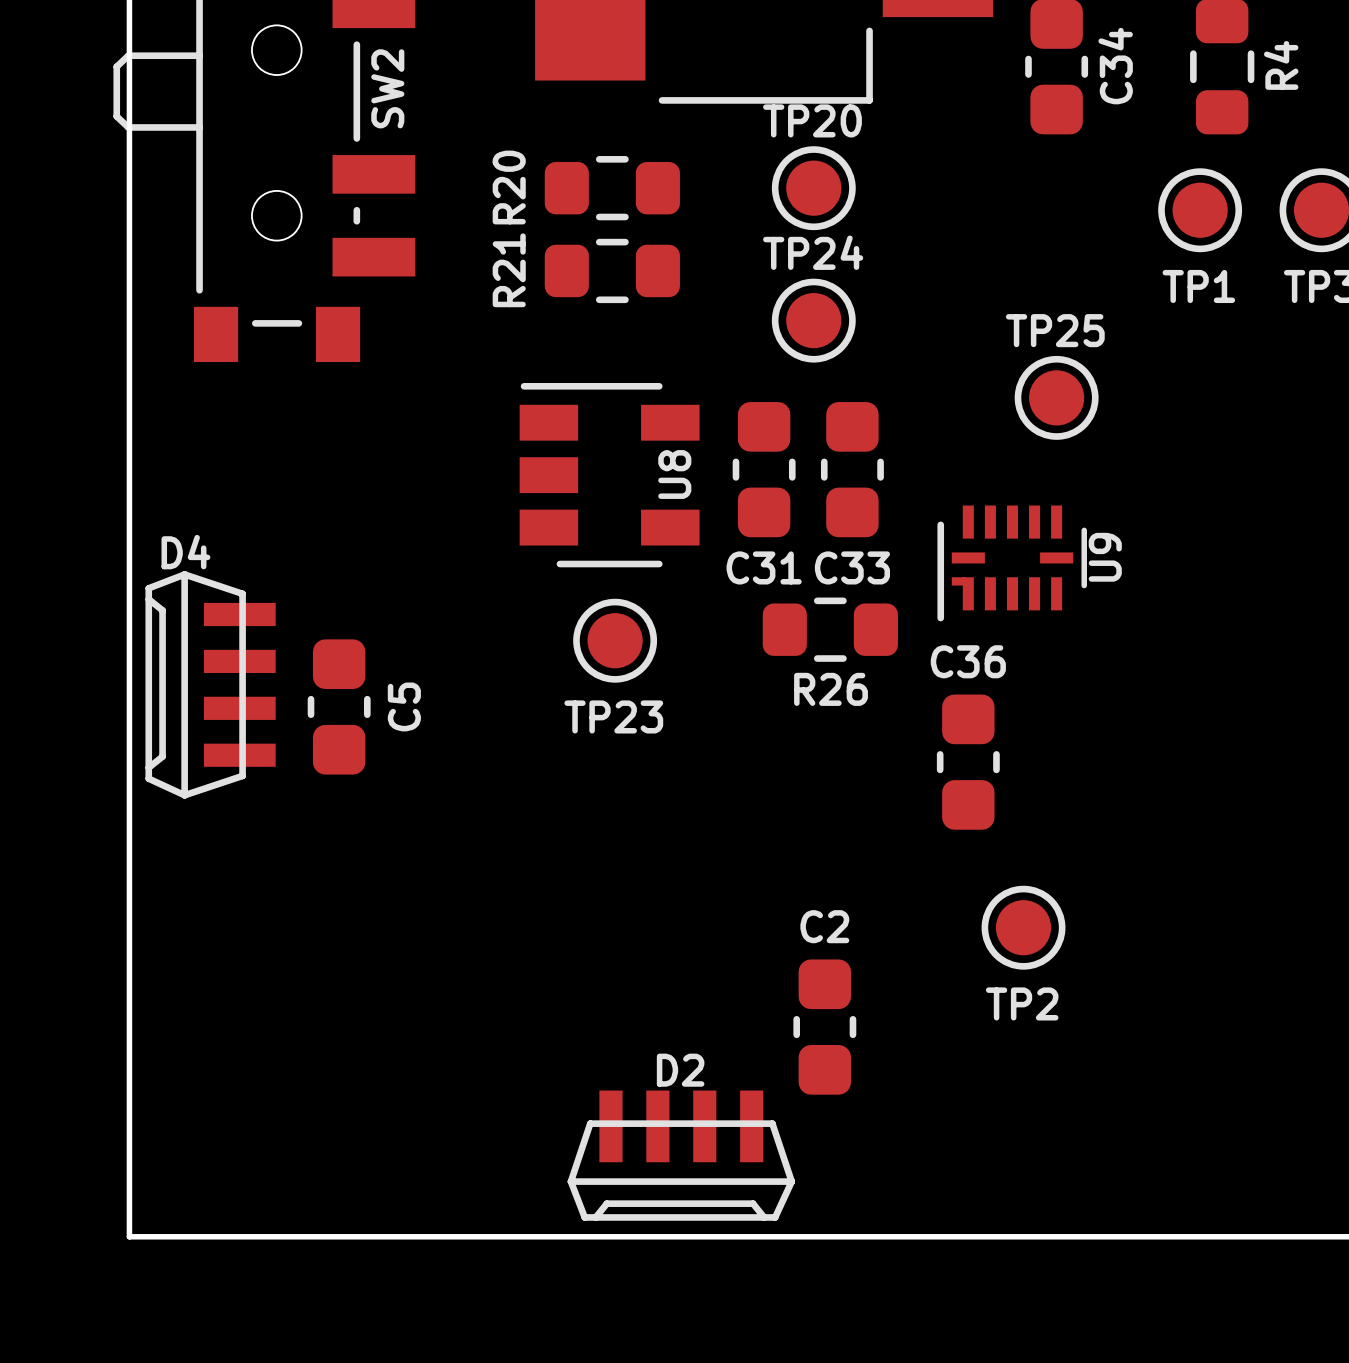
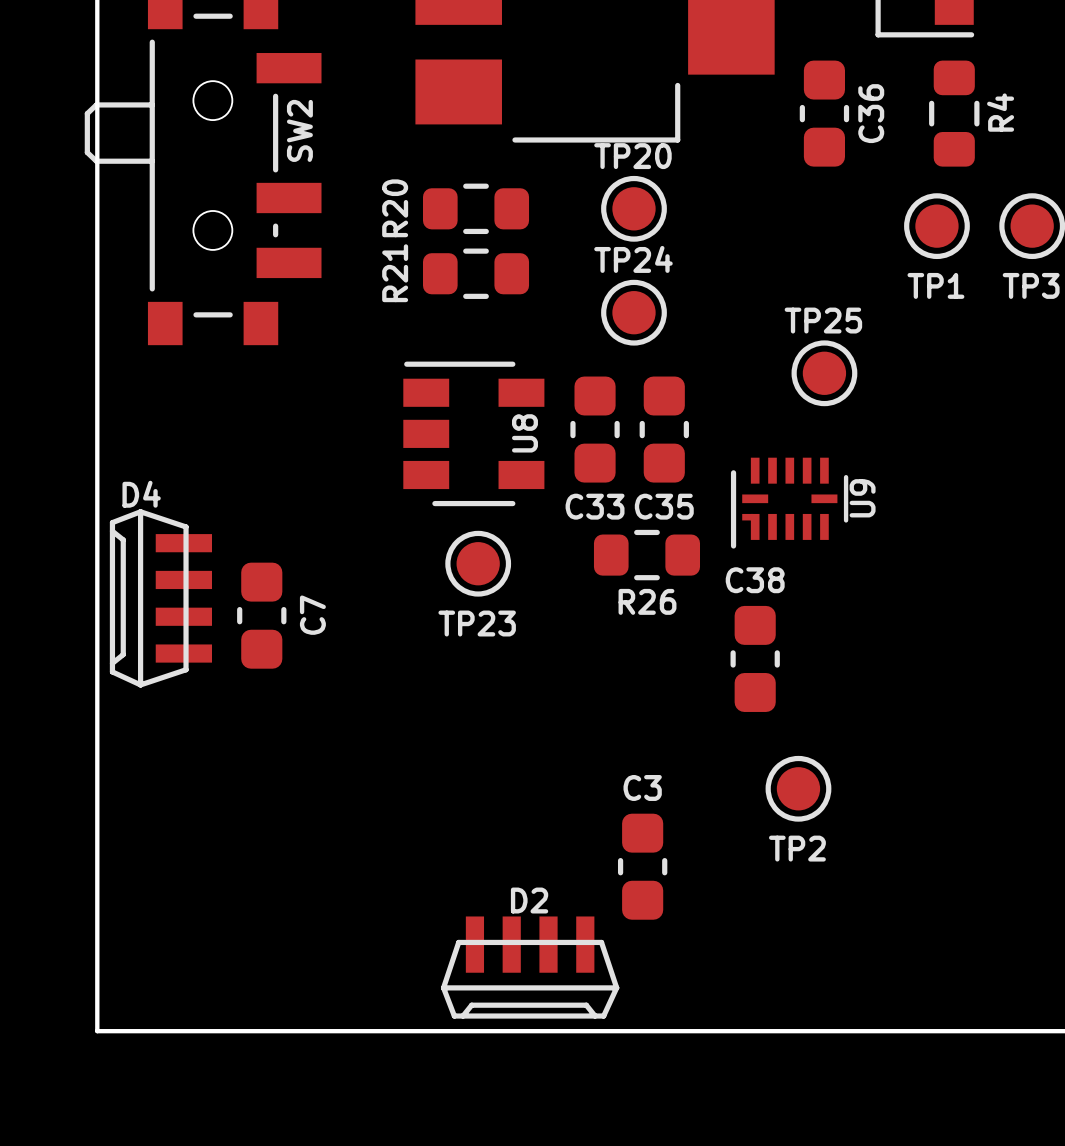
C34 name: C34 (1115, 66) -> C36 (871, 113)
C31 name: C31 (764, 567) -> C33 (595, 506)
C33 name: C33 (852, 567) -> C35 (664, 506)
C36 name: C36 (968, 661) -> C38 (755, 580)
C5 name: C5 (404, 706) -> C7 (312, 615)
C2 name: C2 (824, 926) -> C3 (642, 787)

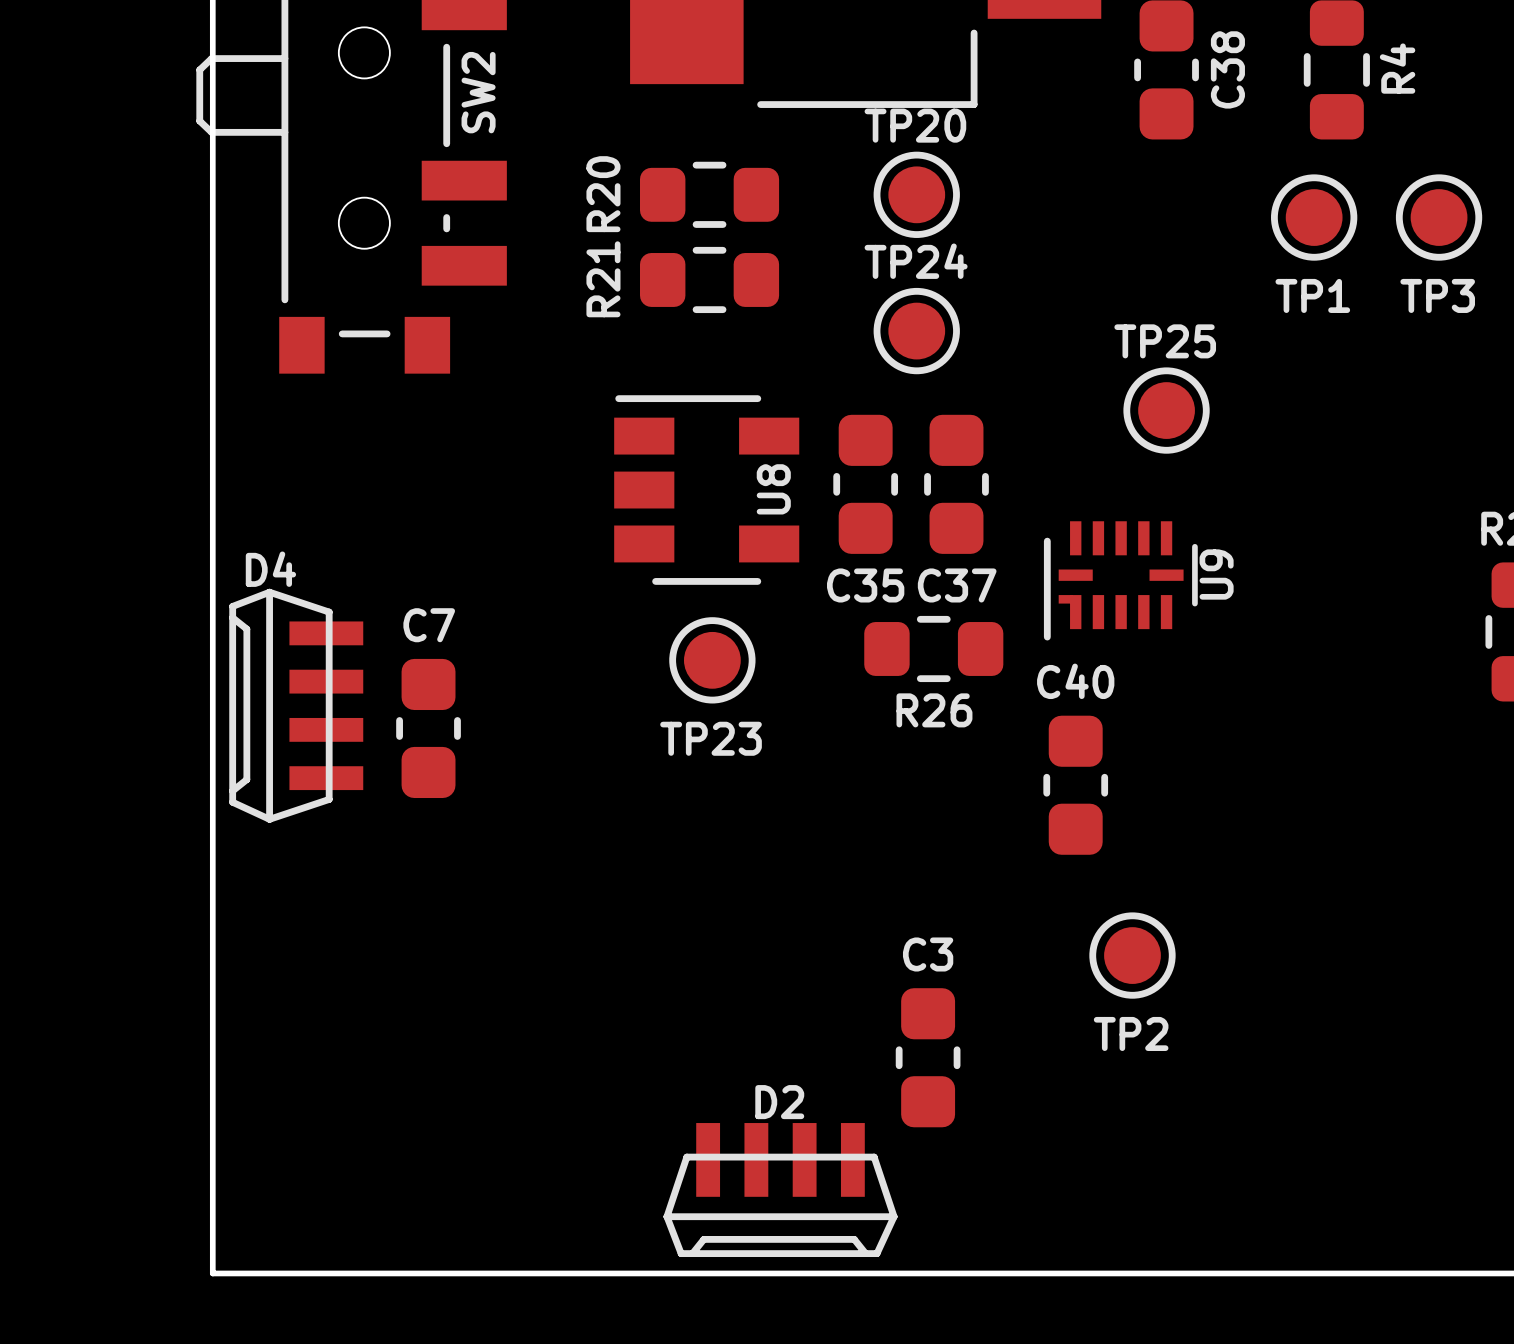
C36 name: C36 (871, 113) -> C38 (1227, 69)
C33 name: C33 (595, 506) -> C35 (865, 585)
C35 name: C35 (664, 506) -> C37 (957, 585)
C38 name: C38 (755, 580) -> C40 (1075, 681)
C7 name rotation: 0° (312, 615) -> 90° clockwise (429, 625)
C7 name position: C7 (312, 615) -> C7 (429, 625)

